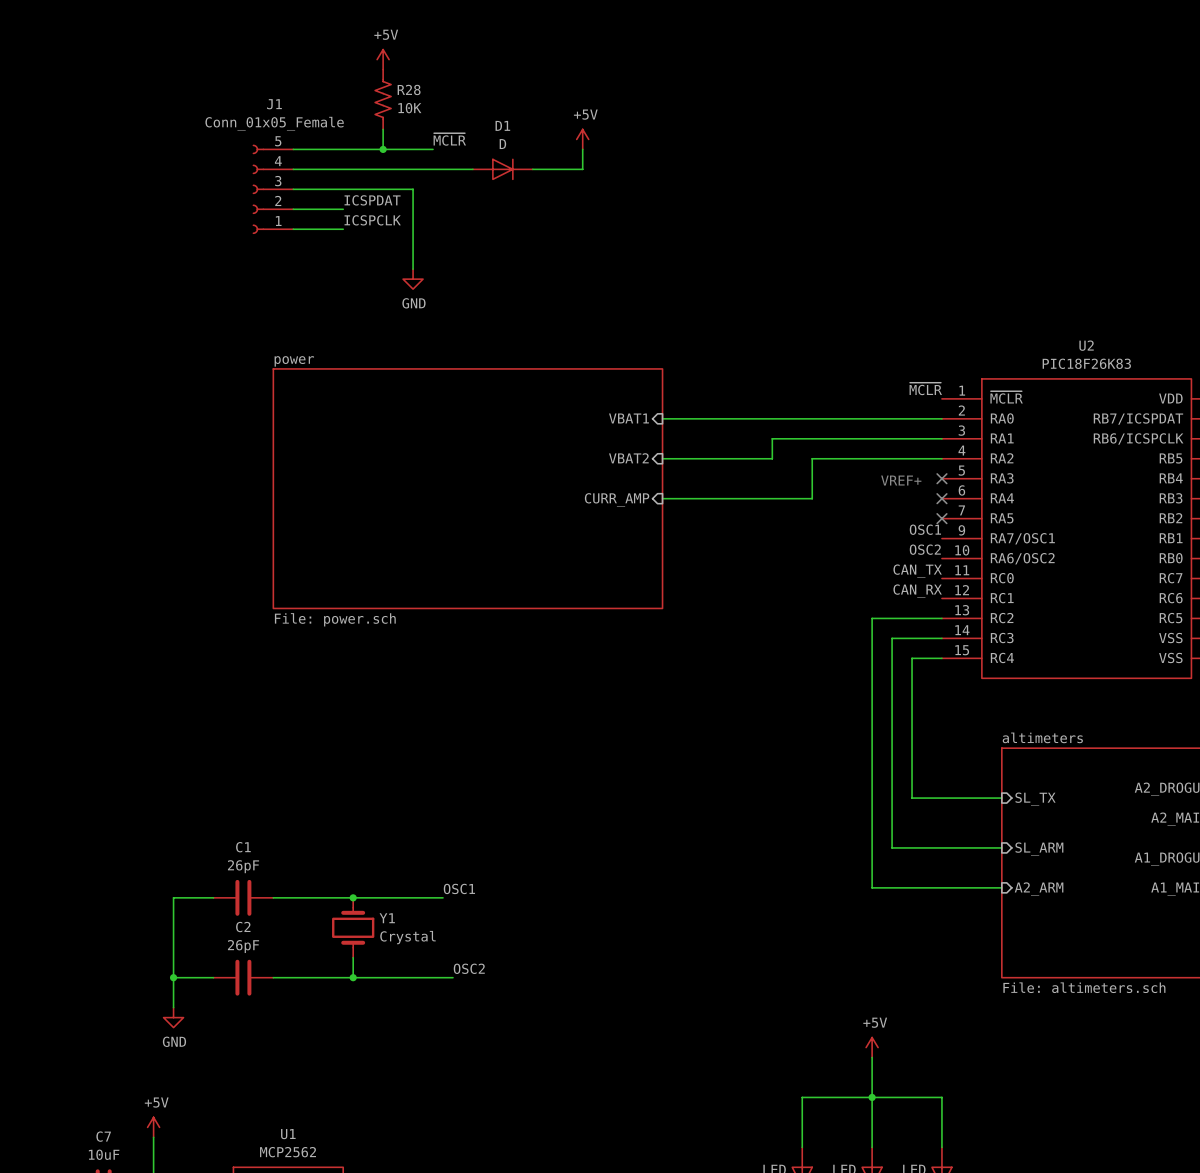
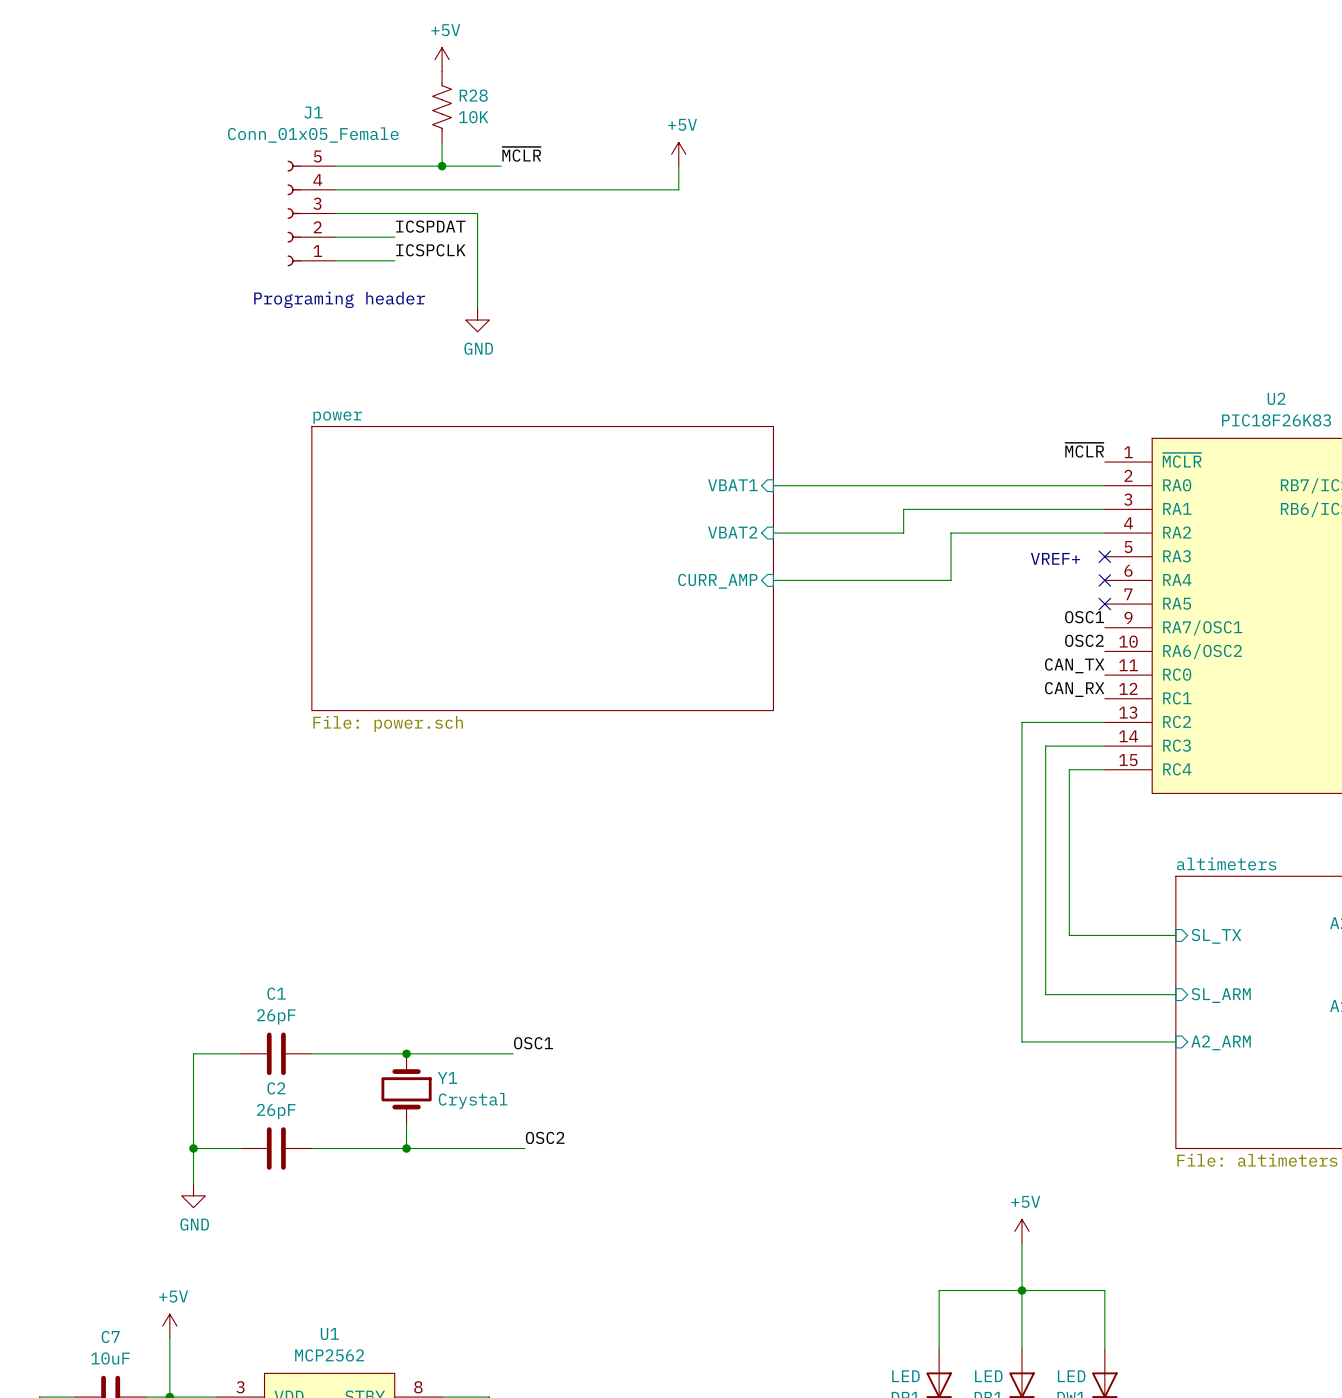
D1: D (502, 169) -> none
text: none -> Programing header (339, 299)

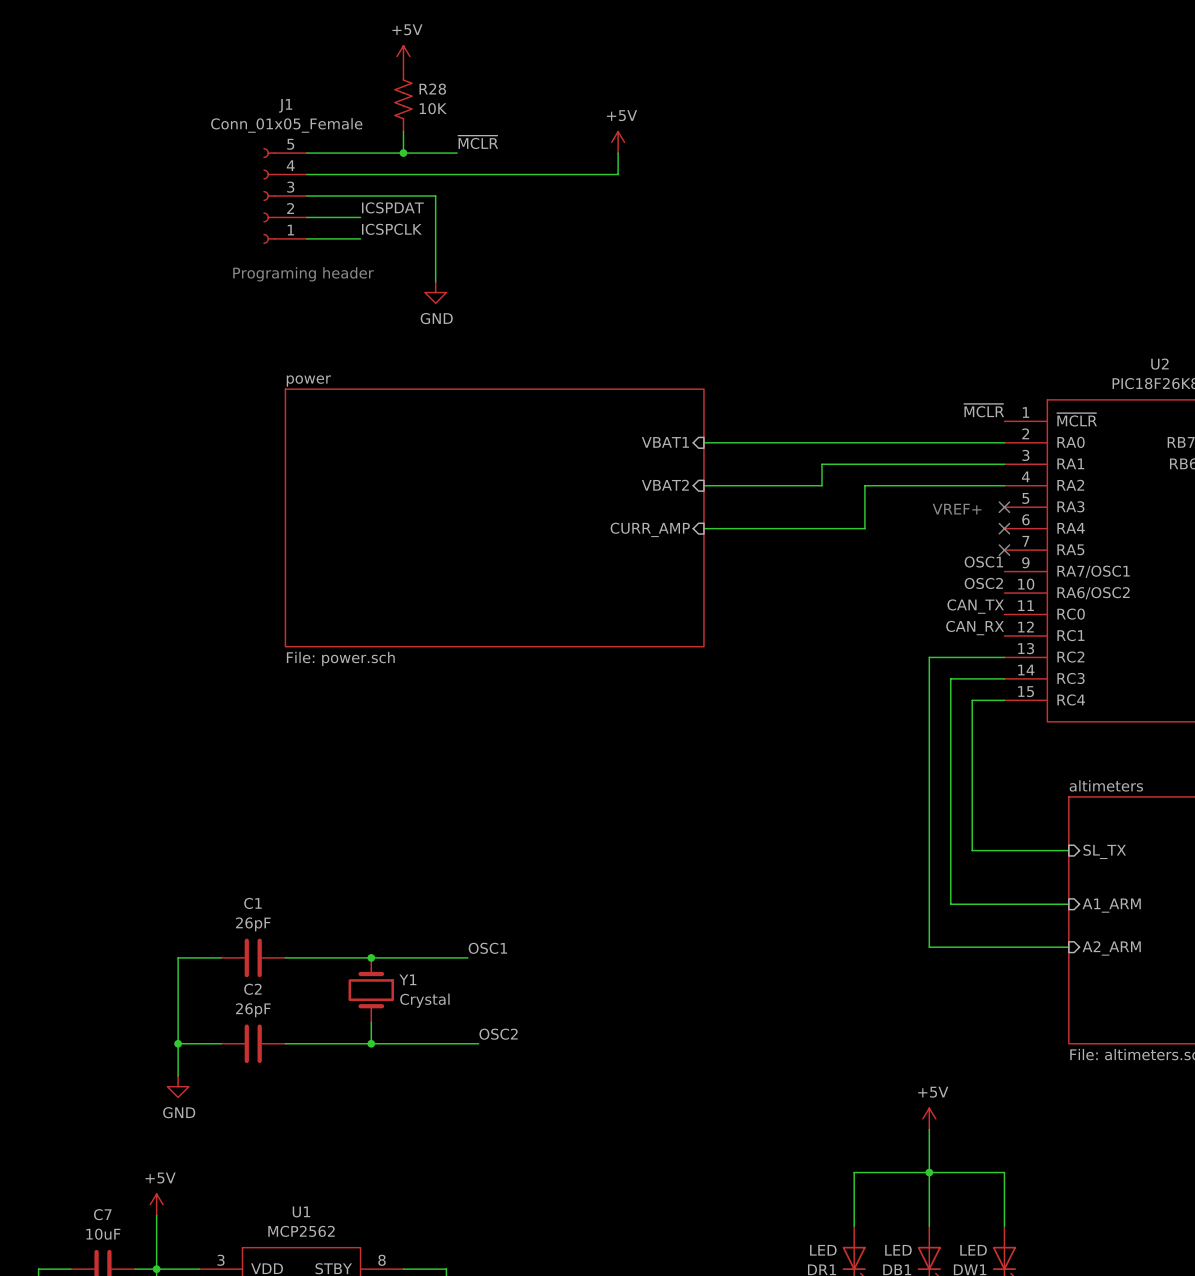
sheet pin: SL_ARM (1221, 995) -> A1_ARM (1111, 905)

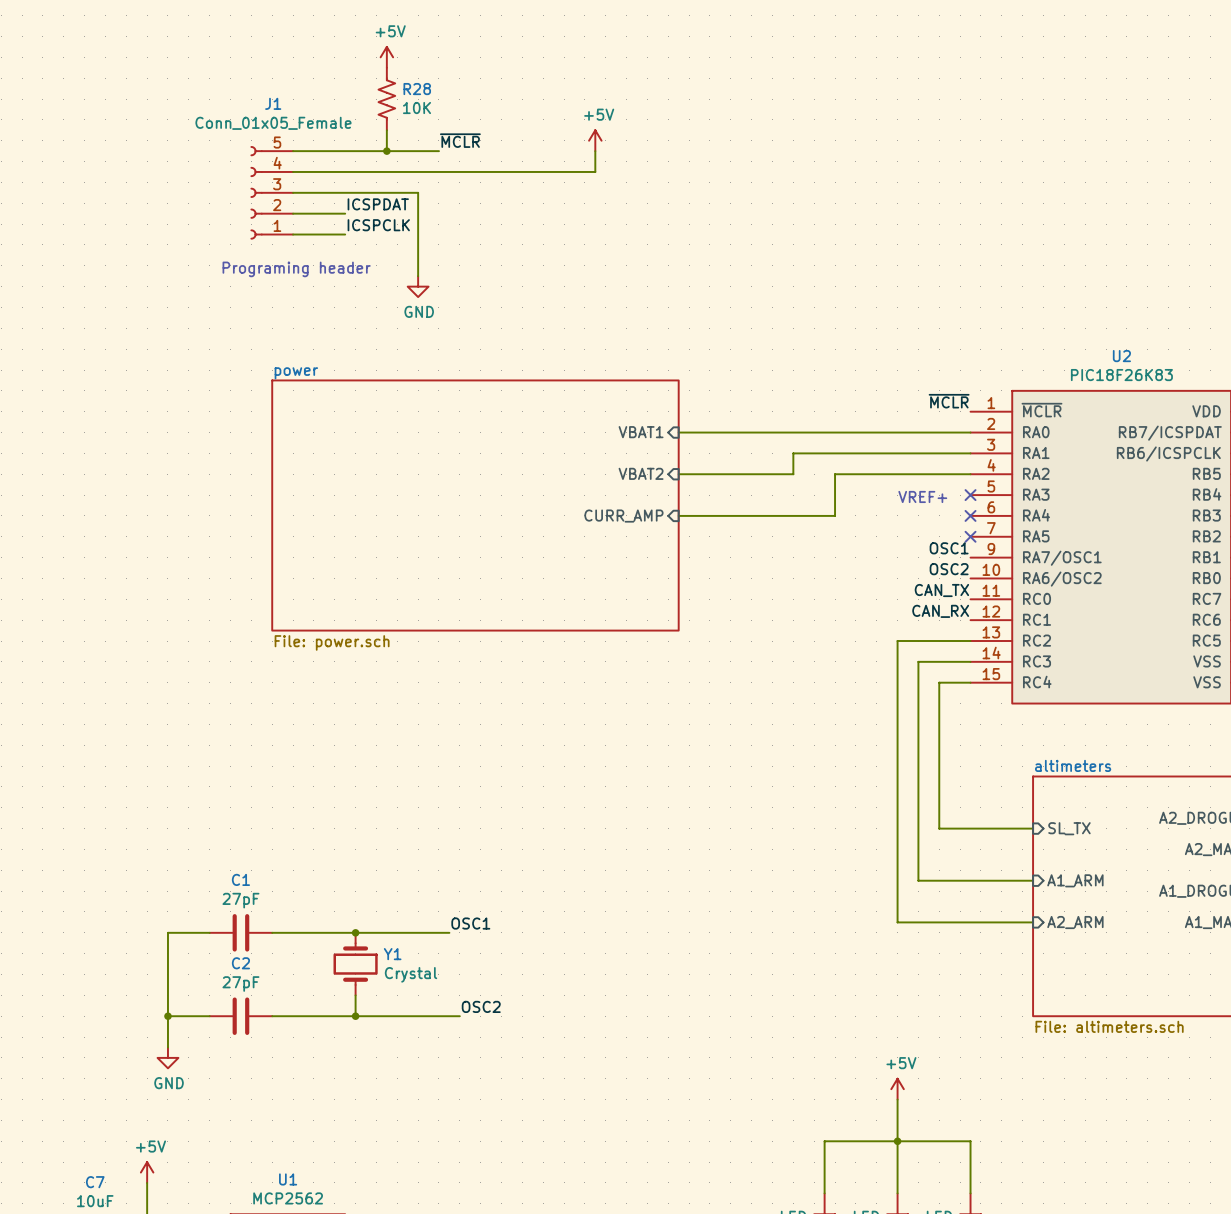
C1 value: 26pF (253, 924) -> 27pF (240, 900)
C2 value: 26pF (253, 1010) -> 27pF (240, 984)

